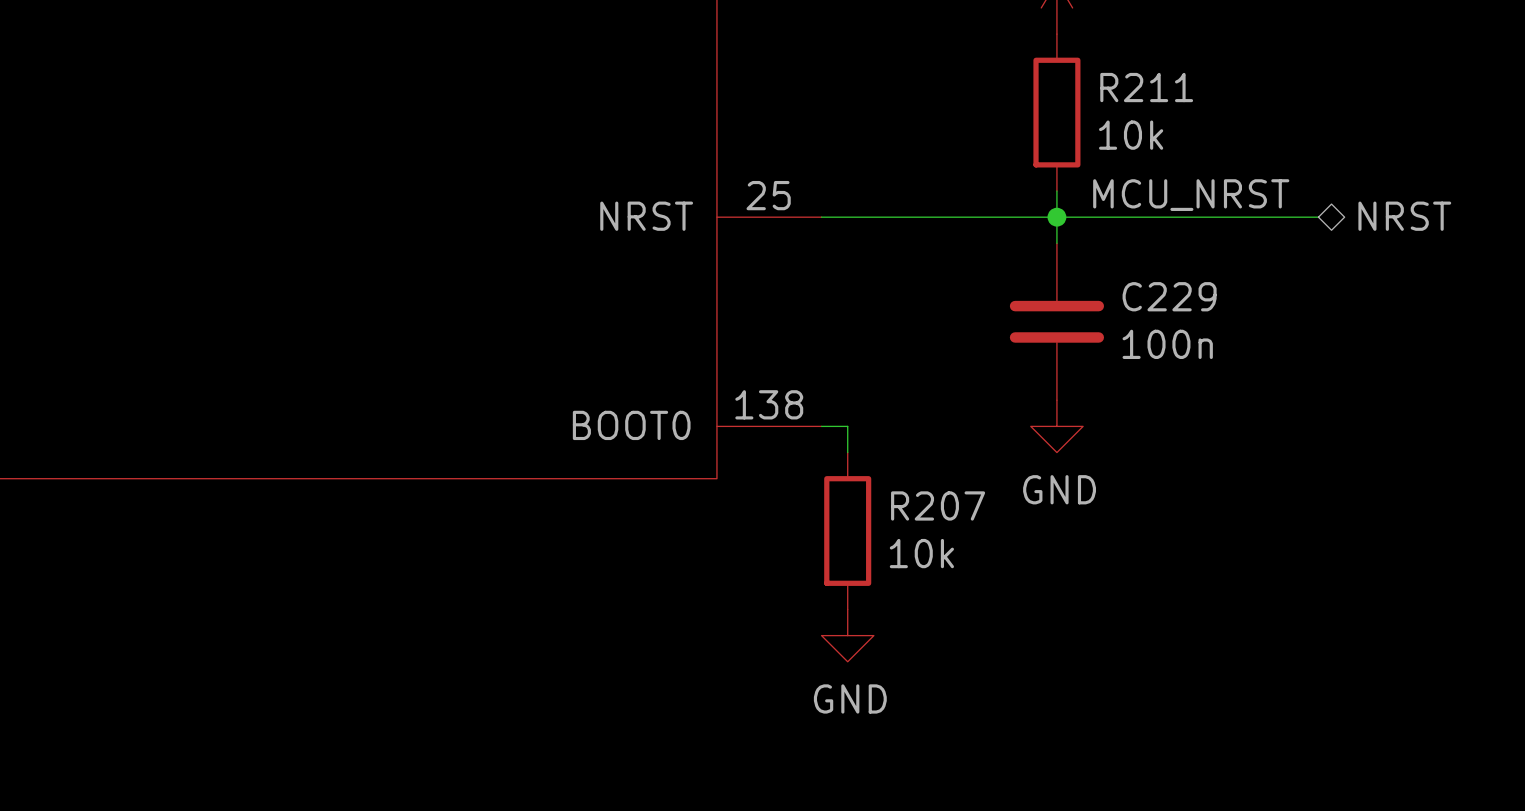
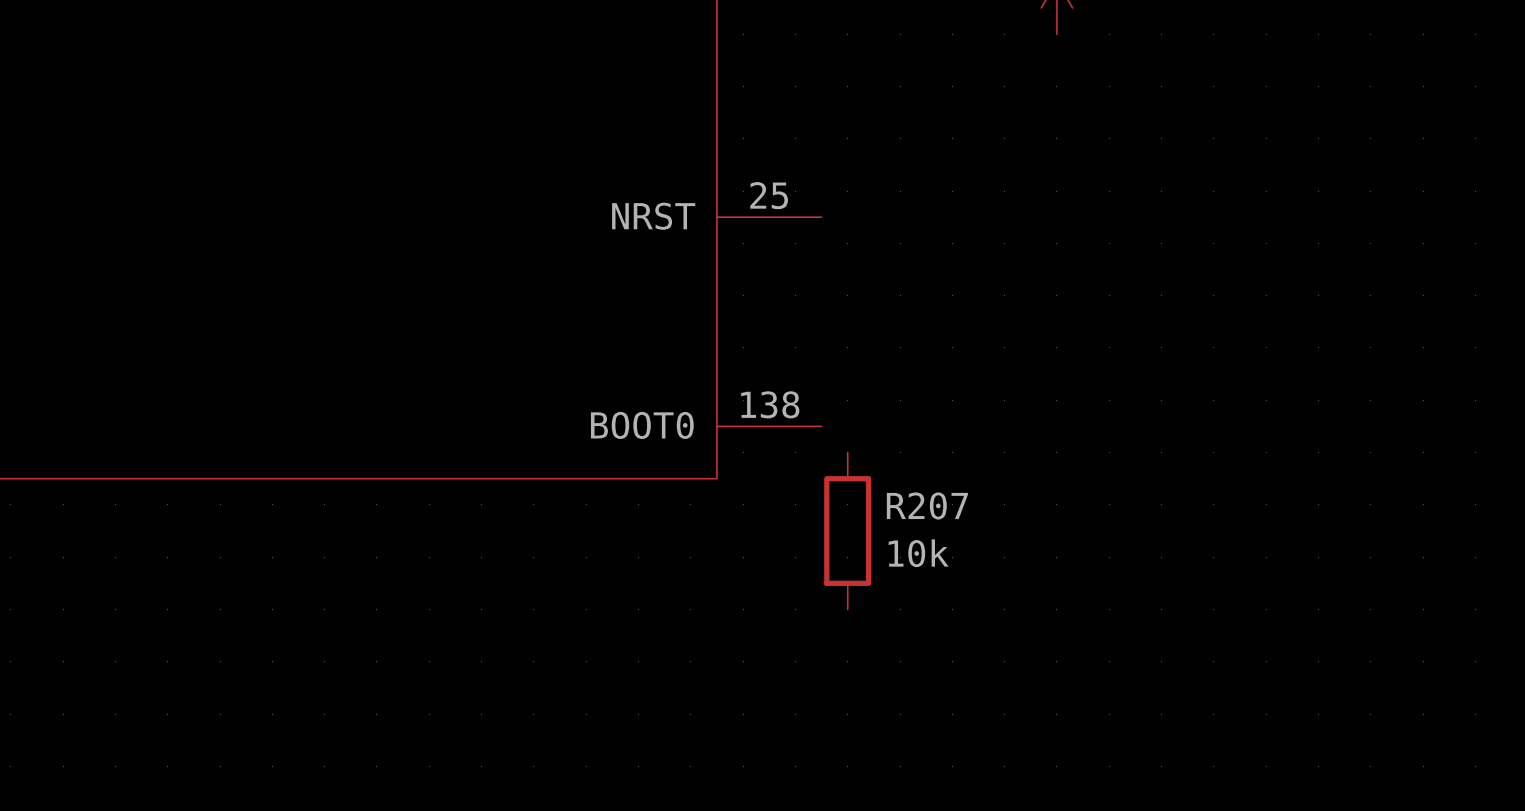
R211: 10k (1056, 112) -> none
wire: (1056, 191) (1056, 243) -> none
label: MCU_NRST (1191, 195) -> none
hierarchical label: NRST (1404, 216) -> none
wire: (821, 217) (1318, 217) -> none
junction: (1056, 217) -> none
C229: 100n (1056, 321) -> none
wire: (821, 426) (847, 426) (847, 452) -> none
power symbol: GND (1056, 426) -> none
power symbol: GND (847, 635) -> none

